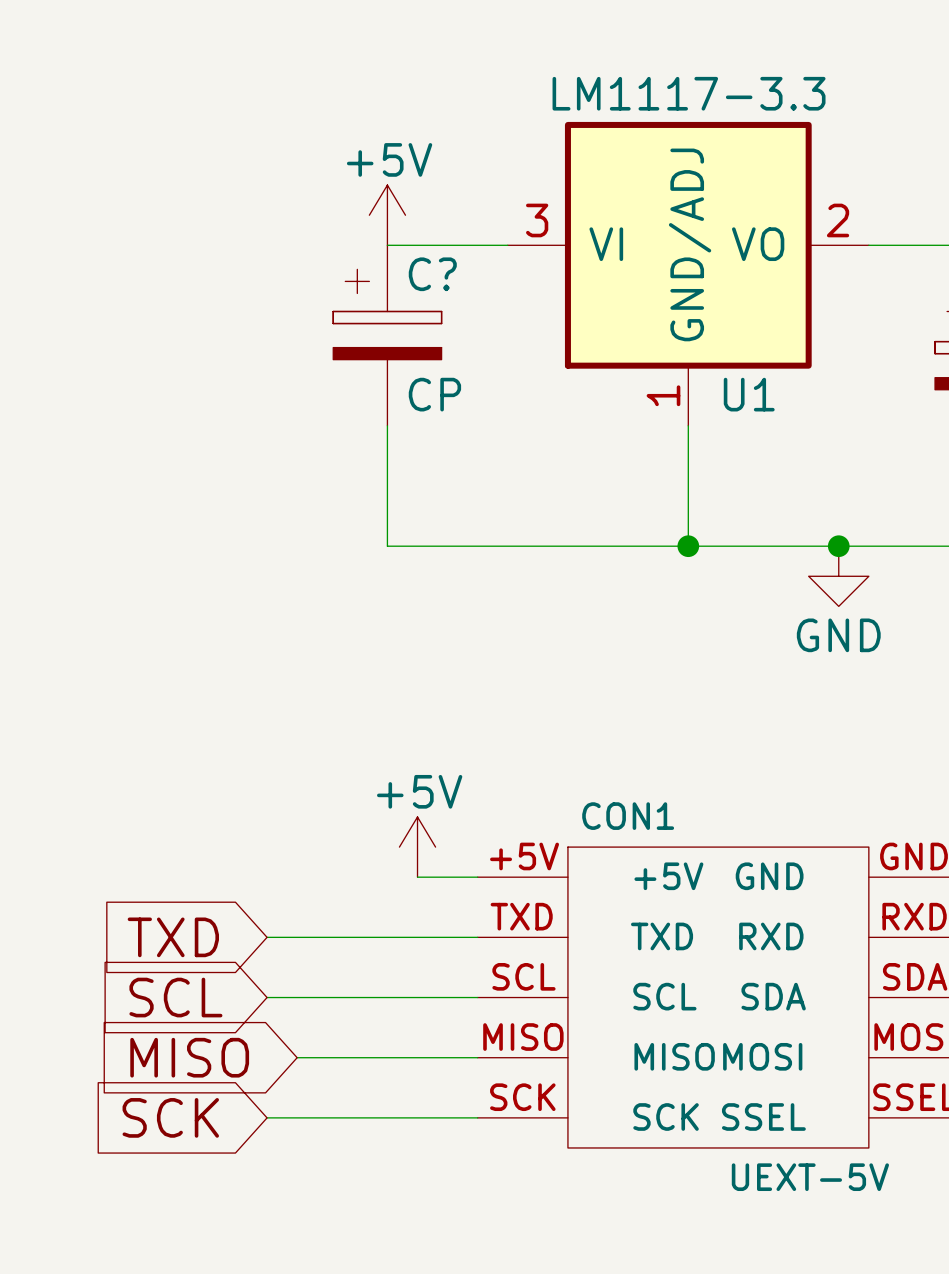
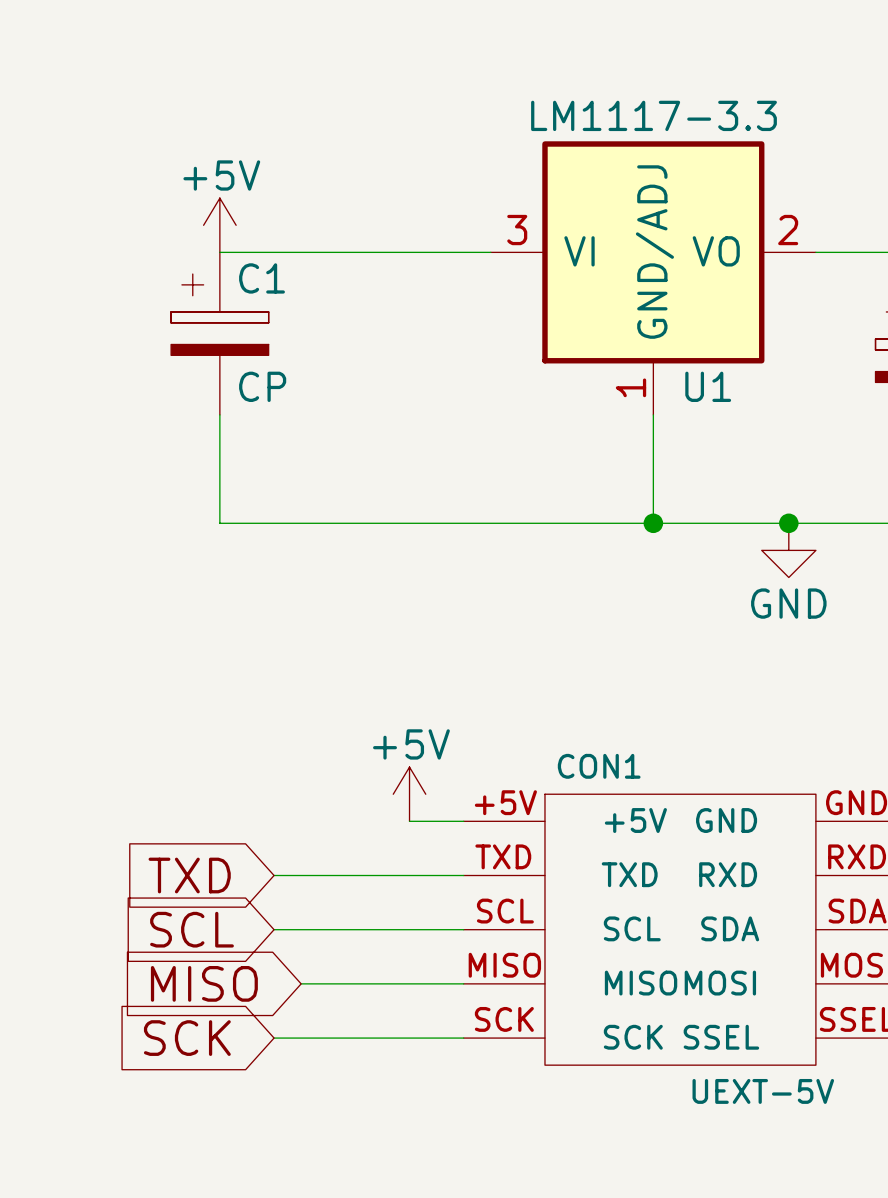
power symbol position: +5V (387, 215) -> +5V (219, 225)
wire: none -> (219, 252) (382, 252)
C1: none -> CP (219, 333)
C?: CP (387, 335) -> none
wire: (387, 425) (387, 546) -> (219, 414) (219, 523) (382, 523)

